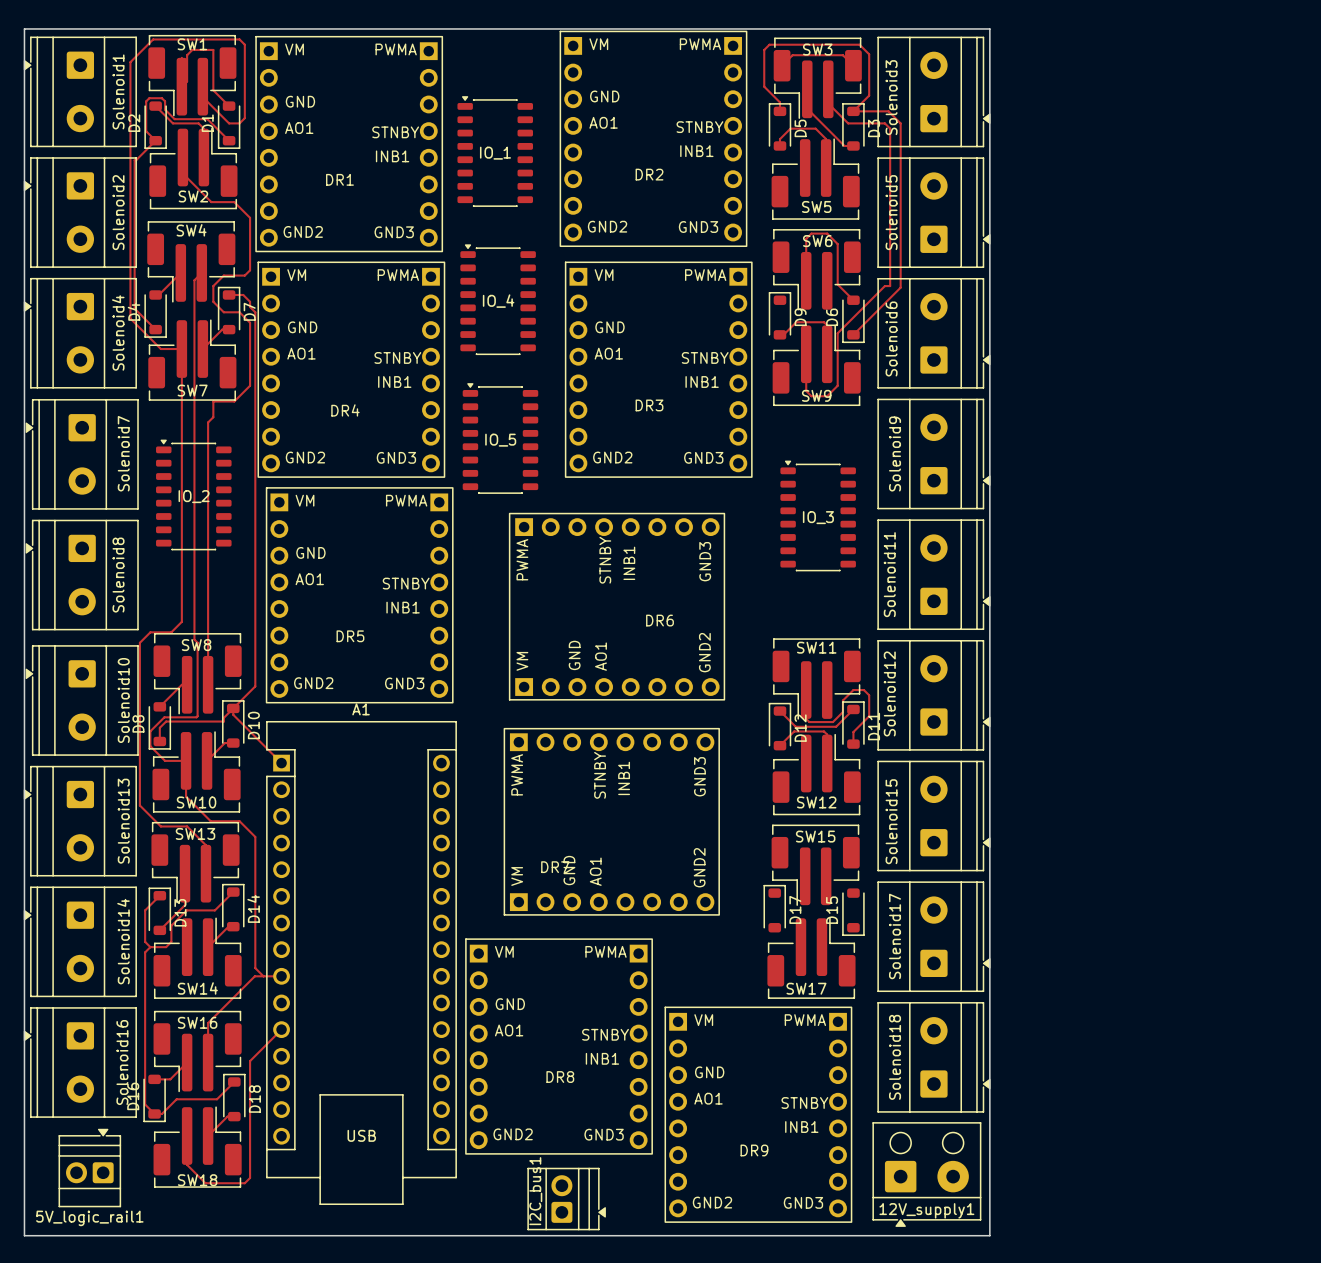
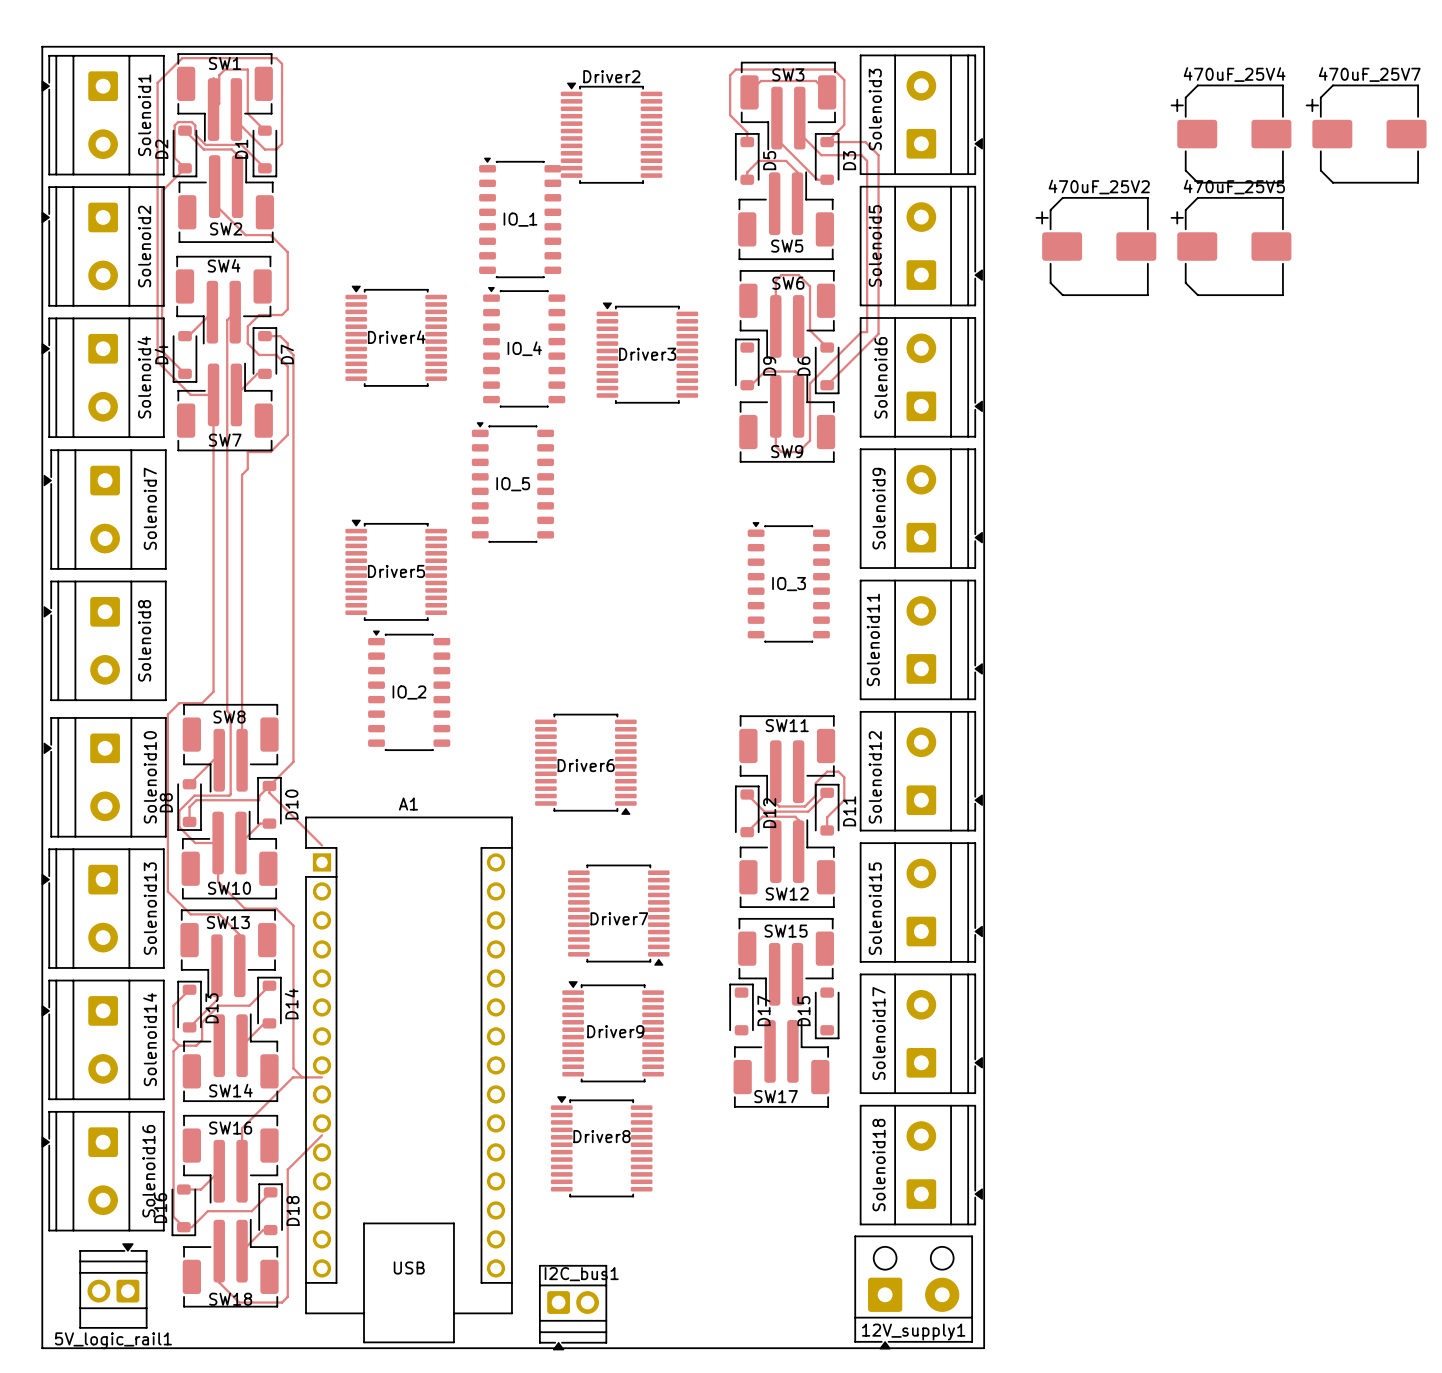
board edge: (890, 28) (989, 28) (989, 1235) (24, 1235) (24, 1225) -> (984, 46) (984, 1348) (42, 1348)
track: (782, 65) (792, 55) (842, 55) (853, 65) -> (749, 92) (760, 80) (815, 80) (827, 92)
SW3 position: (817, 78) -> (788, 106)
track: (807, 89) (807, 108) (844, 145) (853, 145) -> (776, 118) (776, 139) (817, 179) (827, 179)
track: (828, 89) (828, 103) (848, 123) (884, 123) (890, 128) (890, 286) (884, 286) (837, 333) (837, 385) (827, 396) (811, 396) (806, 390) (806, 354) -> (799, 118) (799, 133) (821, 155) (861, 155) (867, 160) (867, 332) (861, 332) (810, 383) (810, 440) (798, 452) (781, 452) (775, 446) (775, 406)
Solenoid3 position: (934, 91) -> (921, 114)
Solenoid3 name position: Solenoid3 (891, 97) -> Solenoid3 (875, 109)
Driver2: none -> (611, 133)
470uF_25V4: none -> (1231, 134)
470uF_25V7: none -> (1366, 134)
track: (779, 111) (779, 102) (764, 86) (764, 49) (769, 44) (859, 44) (869, 54) (869, 95) (853, 111) (888, 111) (900, 123) (900, 287) (853, 334) -> (747, 142) (747, 132) (730, 115) (730, 75) (735, 69) (833, 69) (844, 80) (844, 124) (827, 142) (865, 142) (878, 155) (878, 333) (827, 385)
D5 position: (779, 126) -> (747, 159)
D3 position: (853, 126) -> (827, 159)
part: (653, 138) -> none
part: (349, 144) -> none
track: (779, 145) (779, 139) (790, 128) (815, 128) (826, 139) (826, 168) -> (747, 179) (747, 172) (758, 160) (786, 160) (797, 172) (797, 203)
IO_1 position: (495, 151) -> (520, 217)
text: DR2 (649, 174) -> none
text: DR1 (339, 179) -> none
SW5 position: (815, 179) -> (786, 215)
Solenoid5 position: (934, 212) -> (921, 246)
470uF_25V2: none -> (1096, 246)
470uF_25V5: none -> (1231, 246)
SW6 position: (816, 269) -> (787, 314)
track: (806, 280) (806, 238) (811, 233) (827, 233) (837, 244) (837, 284) (853, 300) -> (775, 326) (775, 280) (781, 275) (798, 275) (810, 286) (810, 330) (827, 347)
Driver4: none -> (396, 336)
IO_4 position: (498, 299) -> (524, 347)
Driver3: none -> (647, 352)
D9 position: (779, 315) -> (747, 364)
D6 position: (853, 319) -> (827, 368)
Solenoid6 position: (934, 333) -> (921, 377)
track: (779, 334) (783, 334) (796, 322) (824, 322) (827, 325) (827, 354) -> (747, 385) (751, 385) (764, 371) (795, 371) (798, 374) (798, 406)
Solenoid6 name position: Solenoid6 (891, 339) -> Solenoid6 (880, 377)
SW9 position: (816, 365) -> (787, 418)
part: (351, 369) -> none
part: (658, 369) -> none
text: DR3 (649, 405) -> none
text: DR4 (345, 410) -> none
IO_5 position: (500, 438) -> (512, 482)
Solenoid9 position: (934, 454) -> (921, 508)
IO_2 position: (193, 494) -> (409, 690)
Driver5: none -> (396, 570)
IO_3 position: (818, 515) -> (788, 582)
Solenoid11 position: (934, 574) -> (921, 639)
part: (359, 595) -> none
part: (617, 606) -> none
text: DR6 (660, 620) -> none
text: DR5 (350, 636) -> none
SW11 position: (816, 678) -> (787, 759)
Driver6: none -> (585, 764)
track: (806, 690) (806, 718) (809, 722) (832, 722) (842, 712) (842, 700) (853, 690) (863, 690) (869, 695) (869, 716) (853, 732) (853, 744) -> (775, 771) (775, 803) (779, 806) (804, 806) (815, 795) (815, 783) (827, 771) (838, 771) (844, 777) (844, 800) (827, 817) (827, 830)
Solenoid12 name position: Solenoid12 (889, 693) -> Solenoid12 (875, 777)
Solenoid12 position: (934, 695) -> (921, 771)
track: (853, 709) (836, 726) (795, 726) (779, 711) -> (827, 792) (808, 811) (764, 811) (747, 794)
D11 position: (853, 725) -> (827, 809)
D12 position: (779, 726) -> (747, 811)
track: (779, 745) (794, 731) (824, 731) (827, 734) (827, 763) -> (747, 832) (762, 816) (795, 816) (798, 820) (798, 851)
SW12 position: (816, 774) -> (787, 863)
Solenoid15 position: (934, 816) -> (921, 902)
part: (611, 821) -> none
Driver7: none -> (618, 915)
SW15 position: (815, 865) -> (786, 962)
text: DR7 (555, 867) -> none
D17 position: (774, 908) -> (741, 1009)
D15 position: (853, 912) -> (827, 1013)
Driver9: none -> (613, 1031)
Solenoid17 position: (934, 936) -> (921, 1033)
SW17 position: (811, 958) -> (781, 1063)
A1 position: (361, 962) -> (408, 1079)
Driver8: none -> (601, 1146)
part: (559, 1046) -> none
Solenoid18 position: (934, 1057) -> (921, 1165)
text: DR8 (560, 1077) -> none
part: (758, 1114) -> none
text: DR9 (754, 1150) -> none
12V_supply1 position: (926, 1174) -> (913, 1292)
I2C_bus1 rotation: 0° (566, 1199) -> 90° clockwise (573, 1307)
I2C_bus1 position: (566, 1199) -> (573, 1307)

